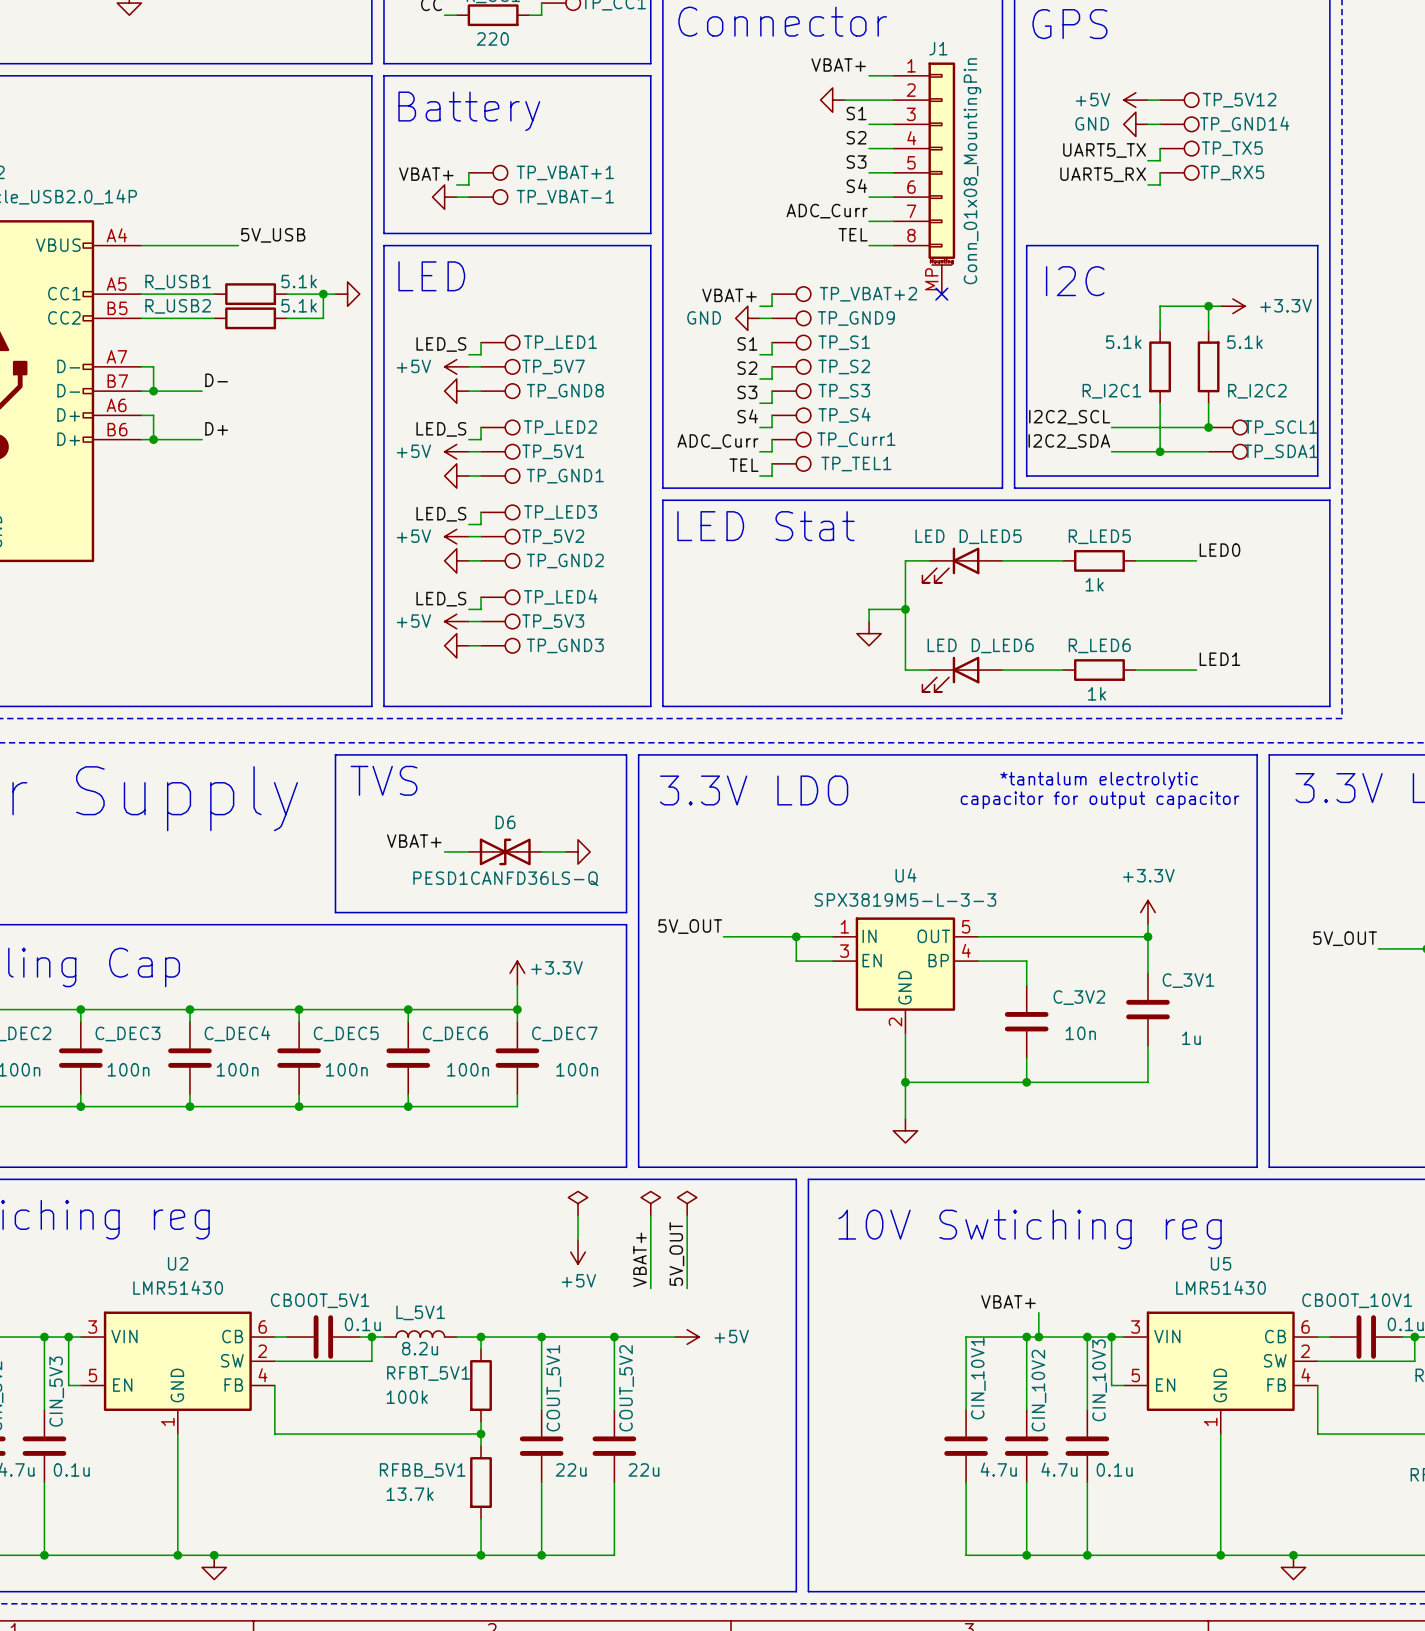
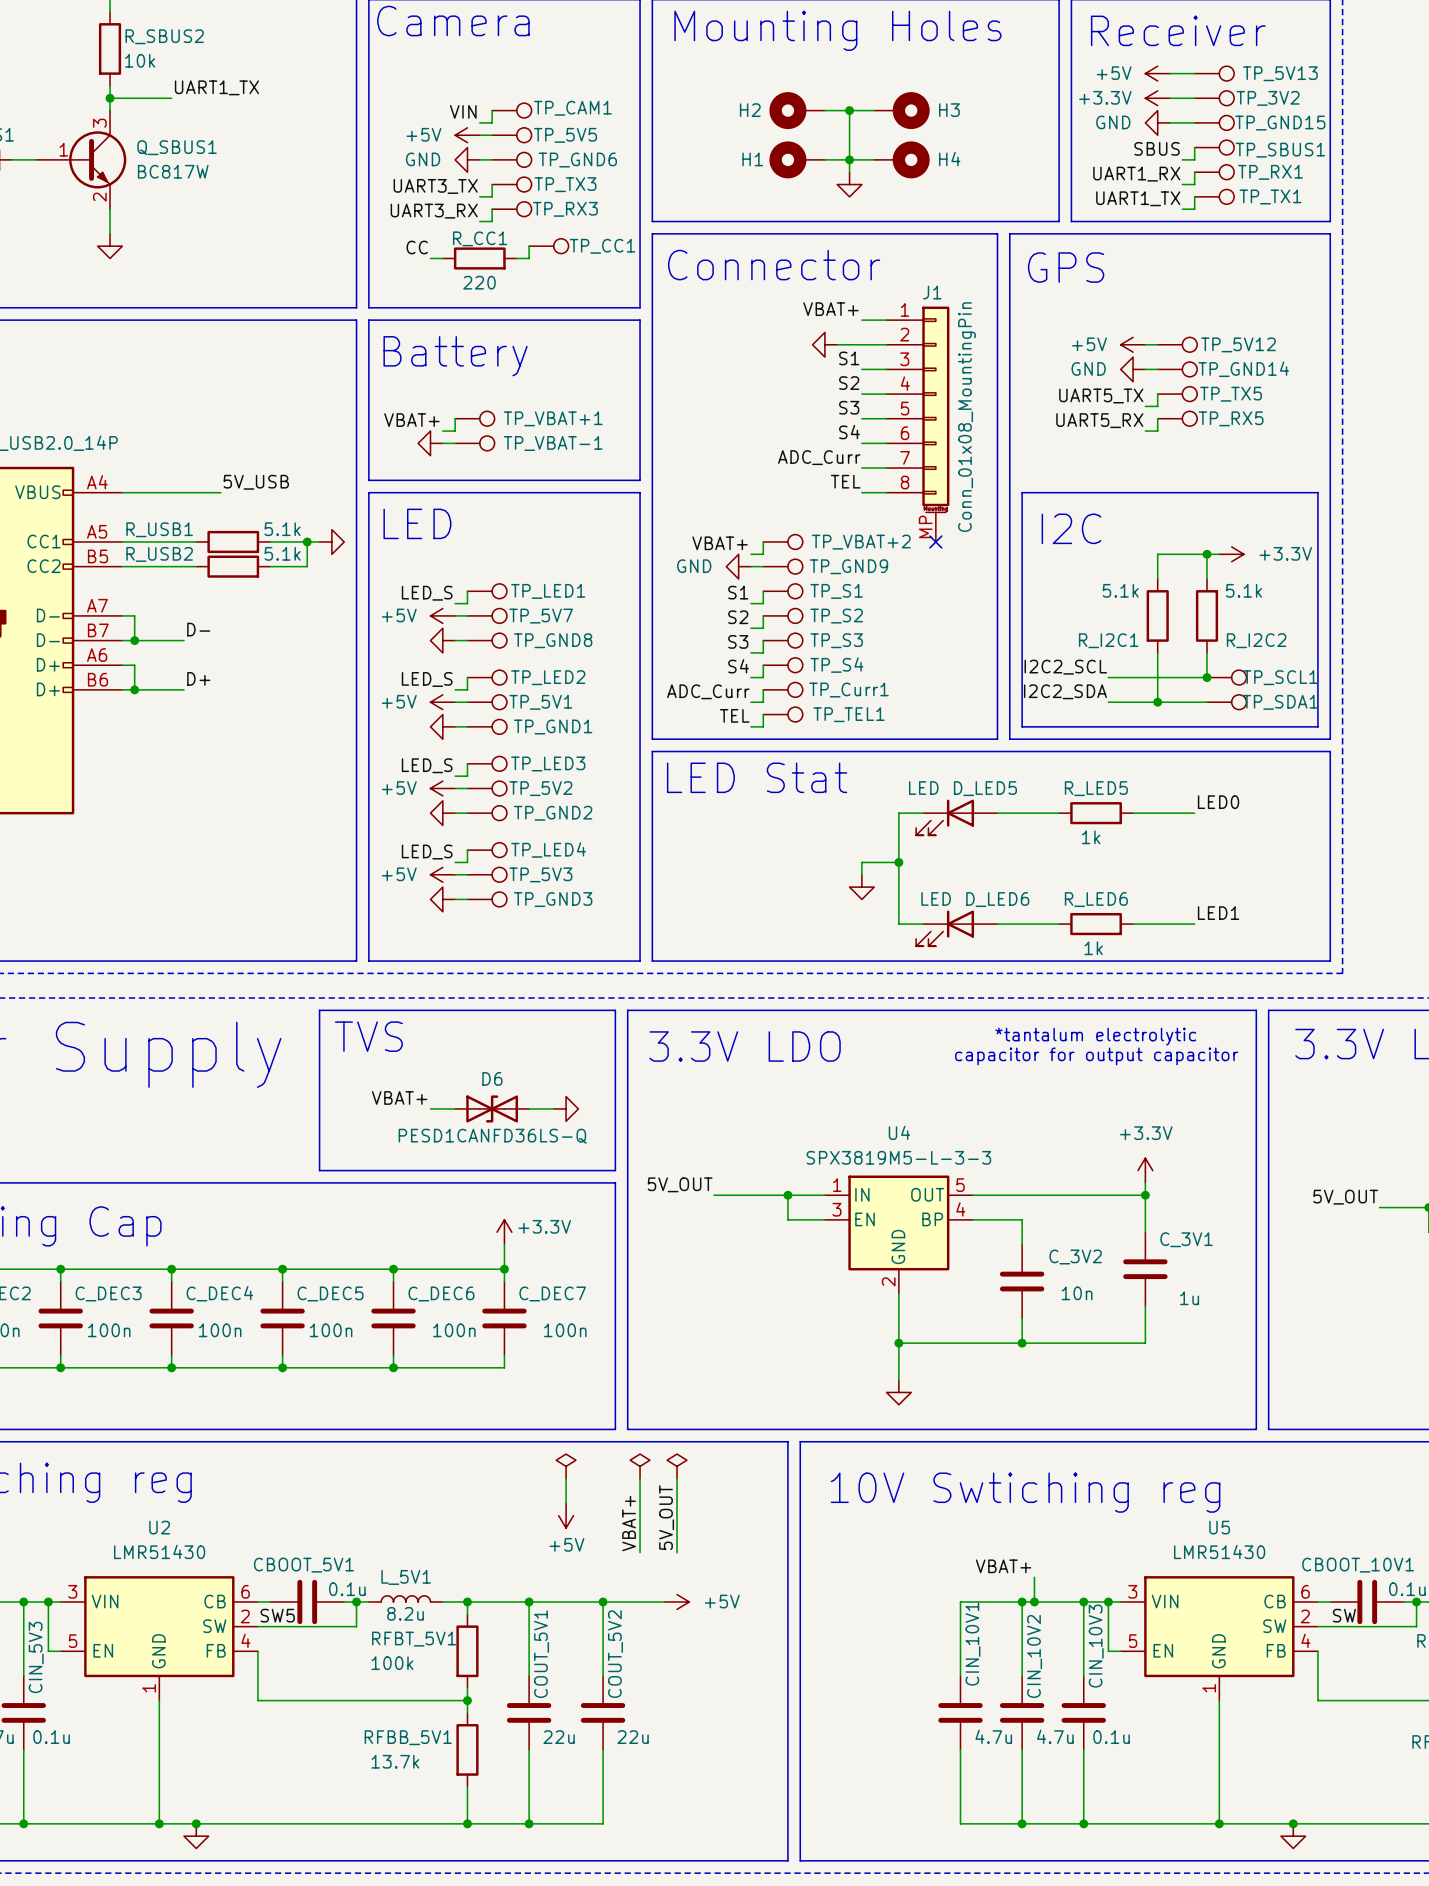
label: none -> SW5 (277, 1615)
label: none -> SW (1344, 1615)

